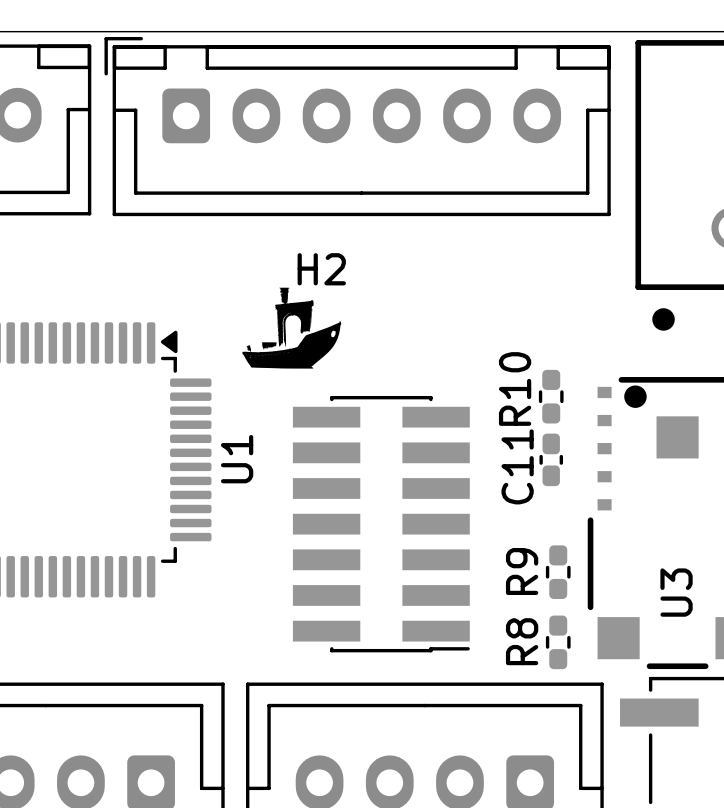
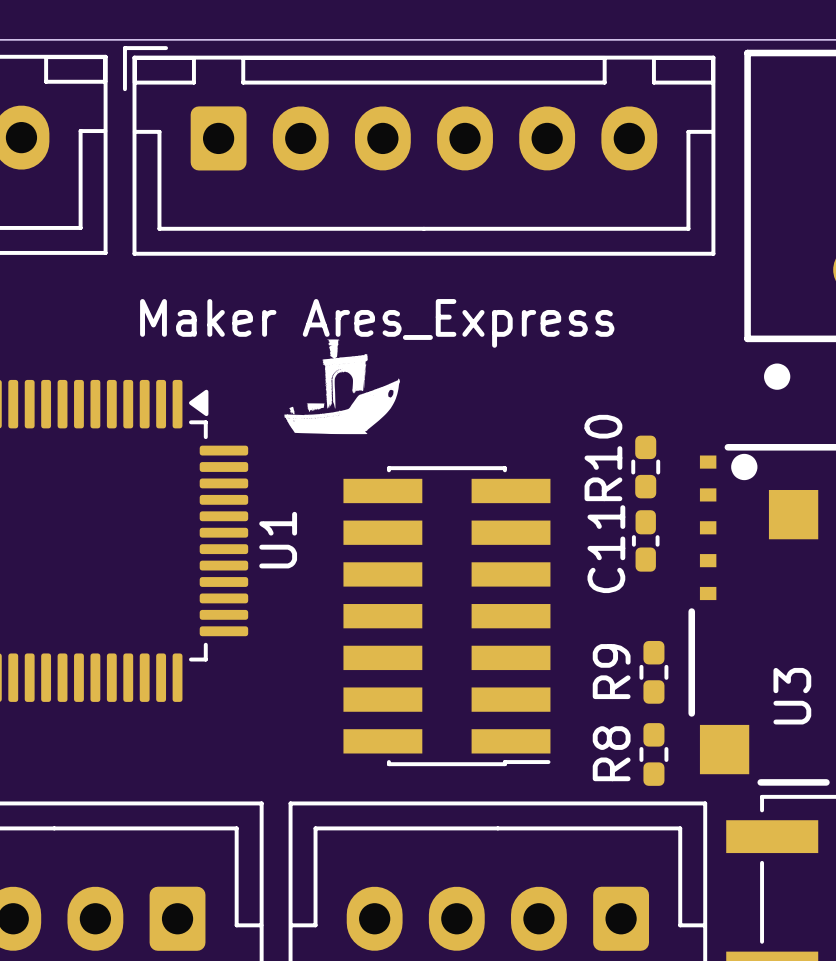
H2 name: H2 (321, 269) -> Maker Ares_Express (377, 323)

